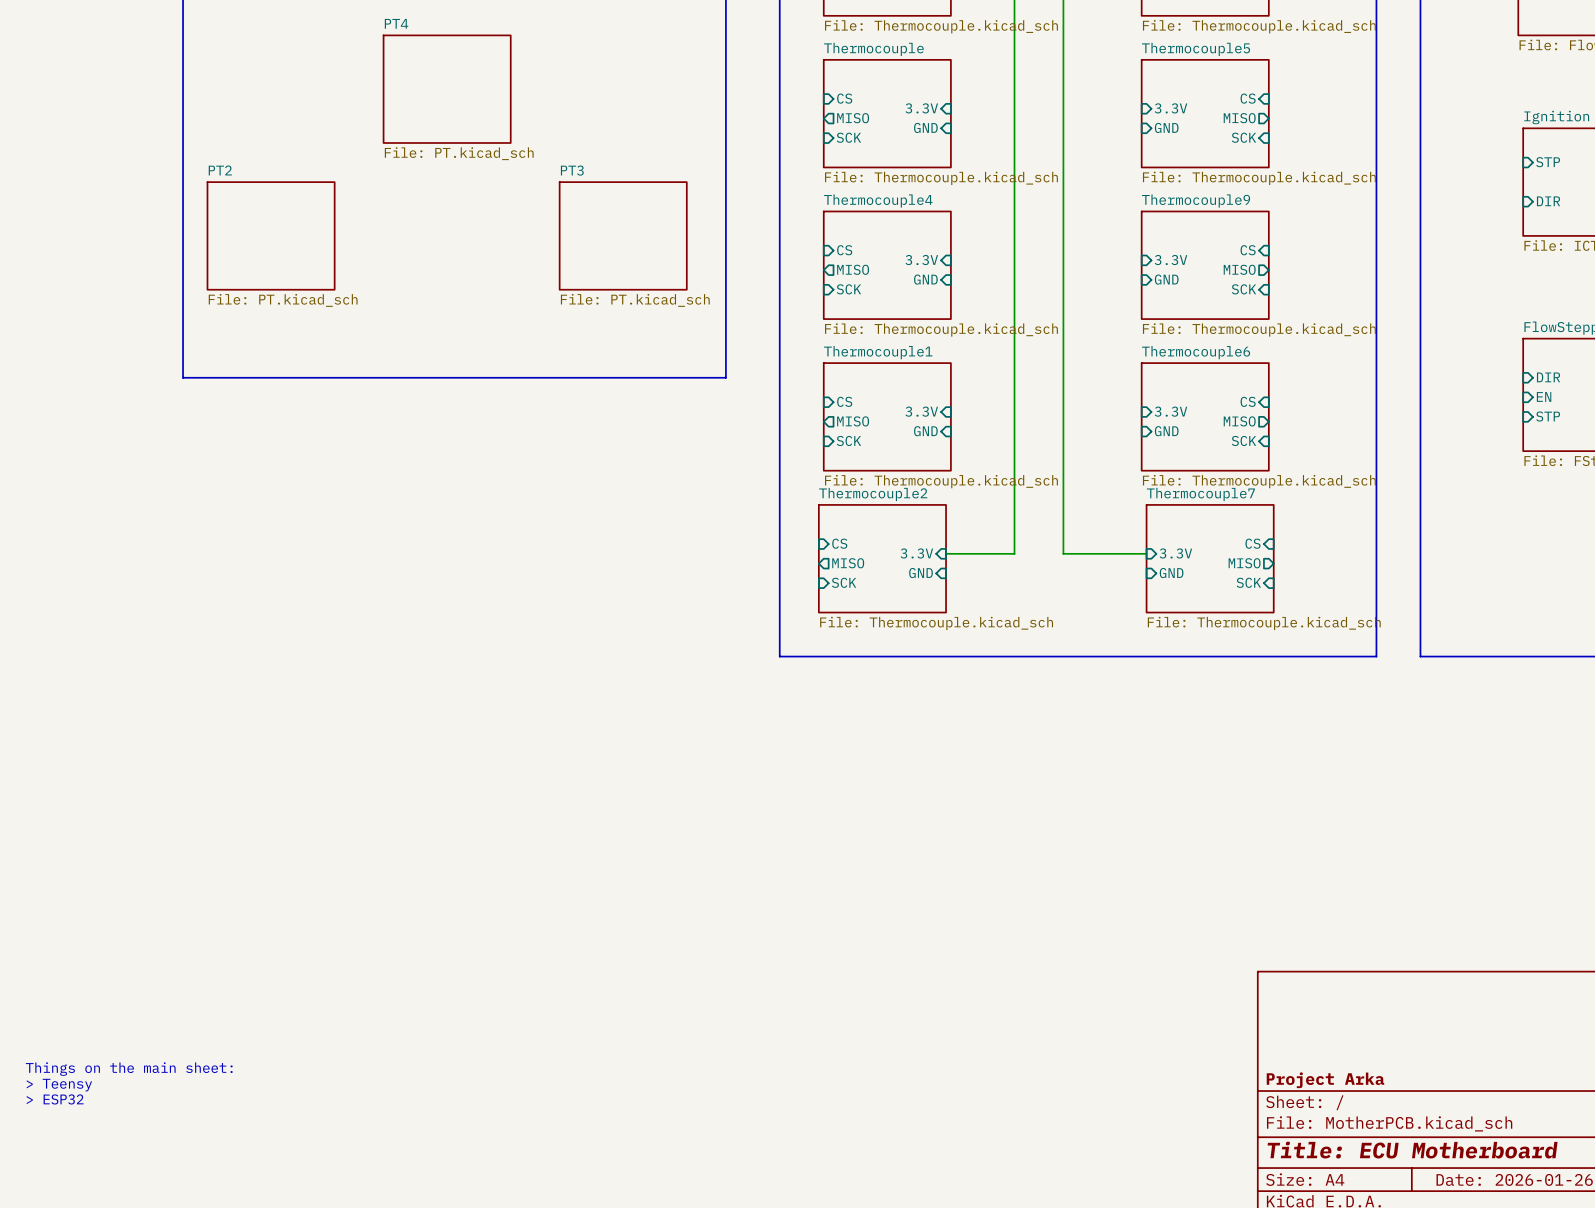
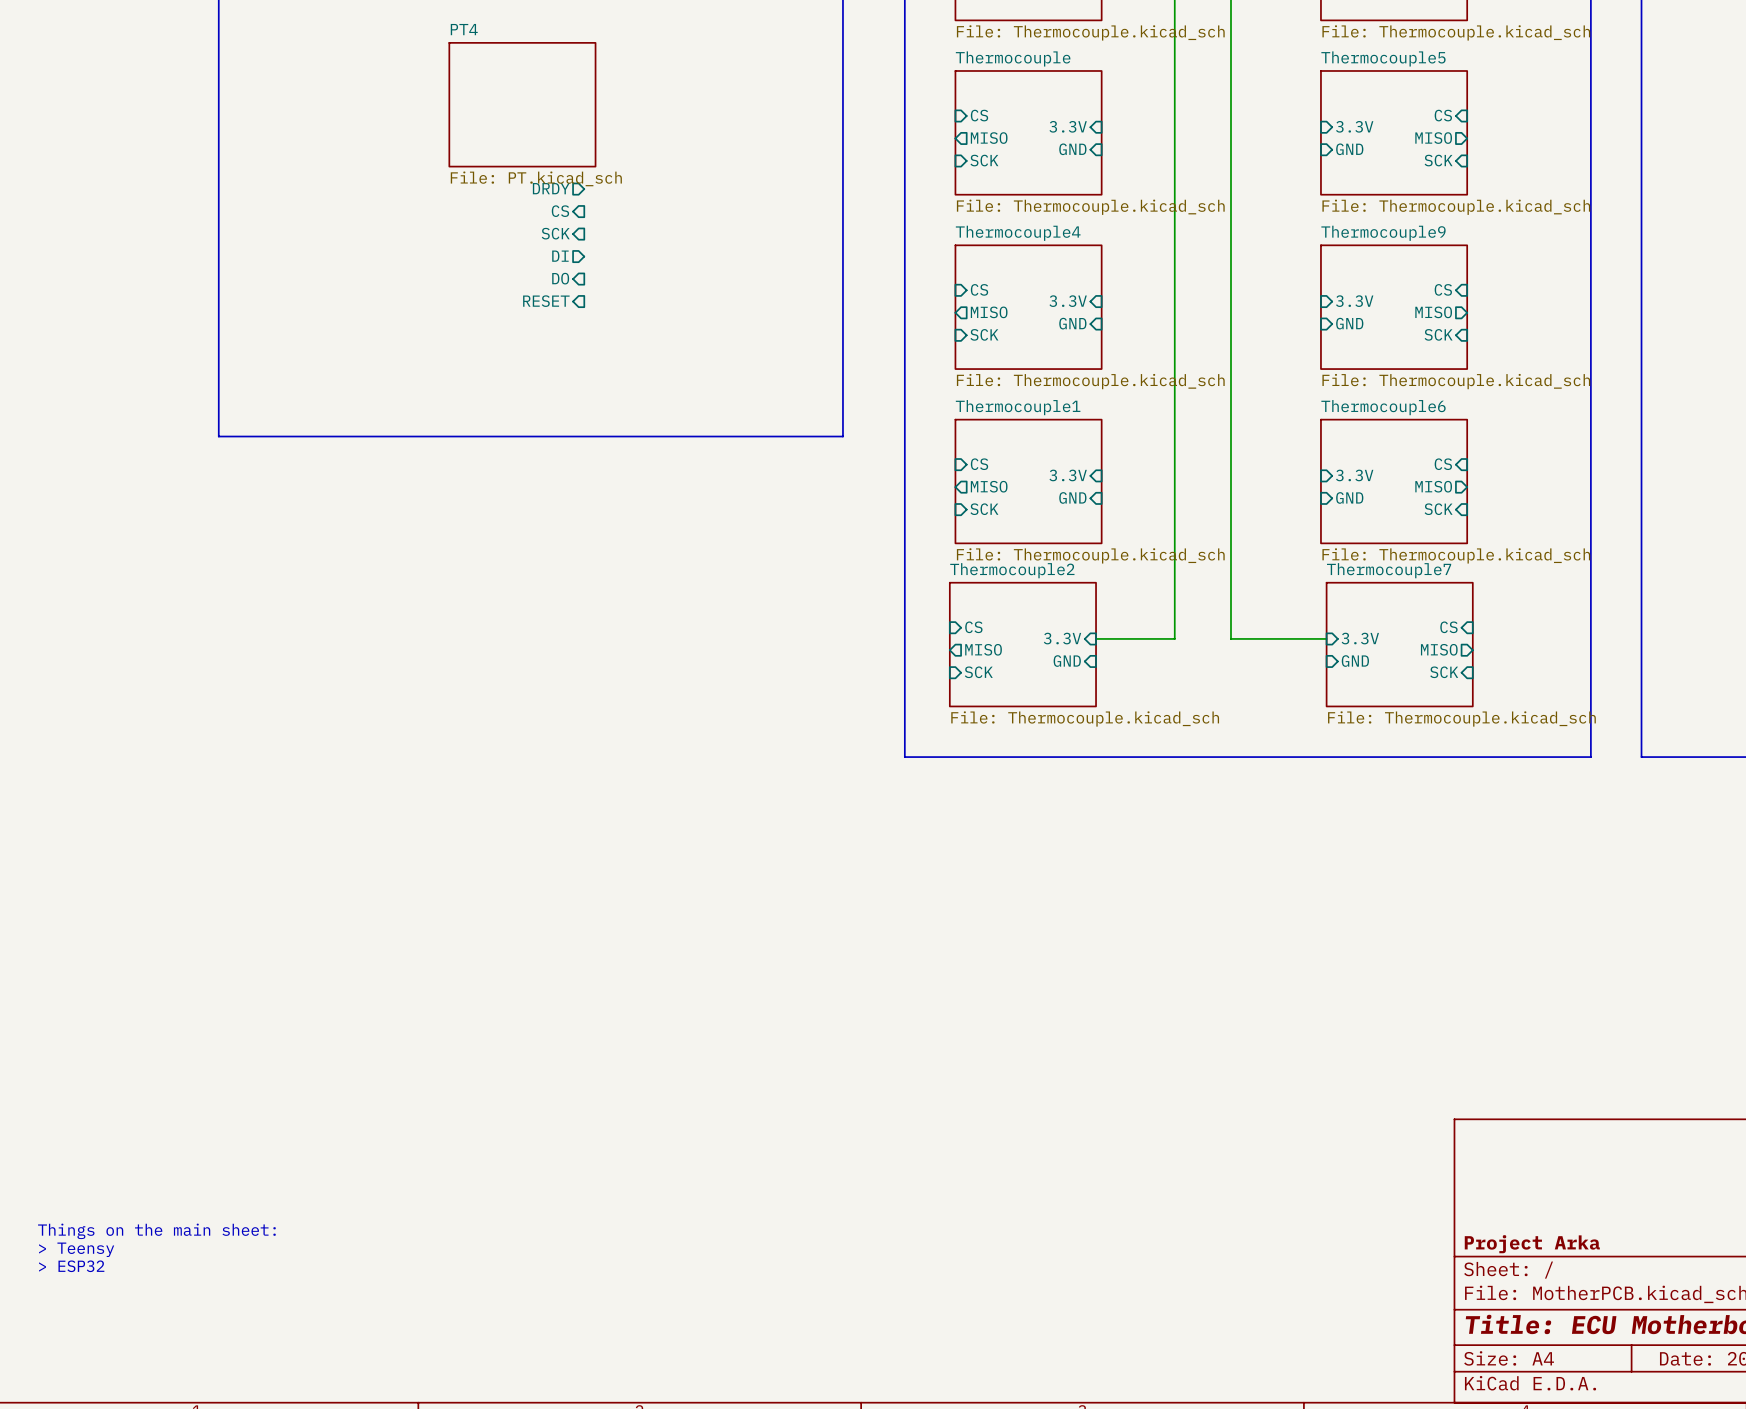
sheet pin: none -> DRDY (551, 188)
sheet pin: none -> CS (560, 211)
sheet pin: none -> SCK (555, 233)
sheet pin: none -> DI (560, 256)
sheet PT2: File: PT.kicad_sch (271, 235) -> none
sheet PT3: File: PT.kicad_sch (623, 235) -> none
sheet pin: none -> DO (560, 278)
sheet pin: none -> RESET (546, 301)

